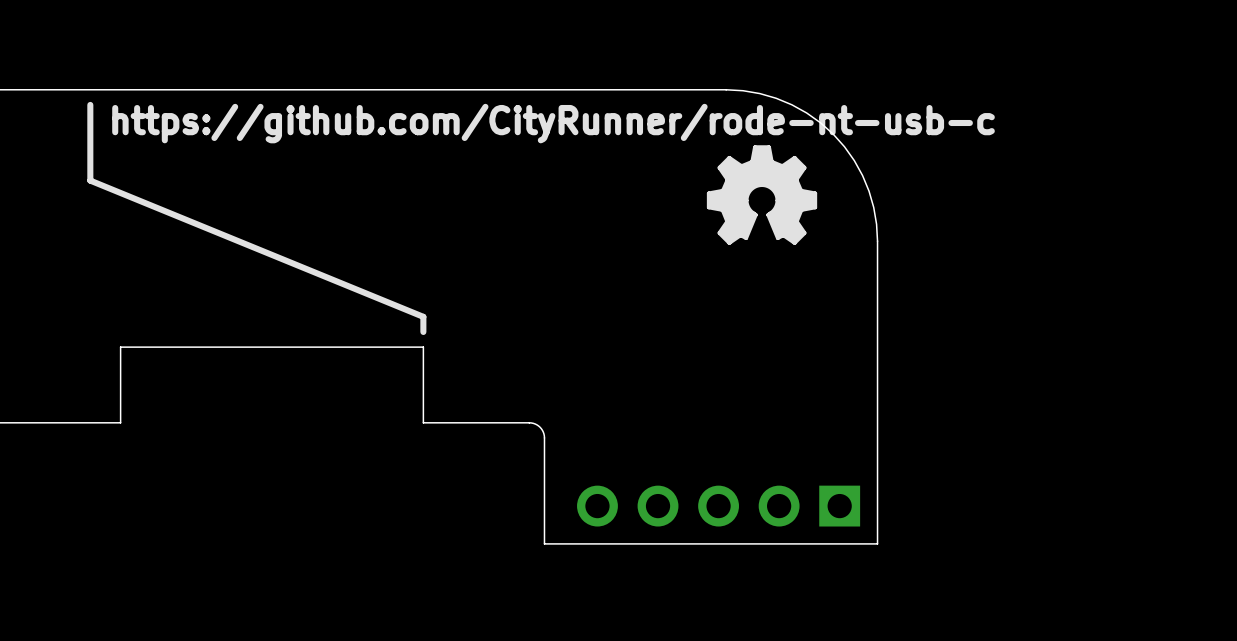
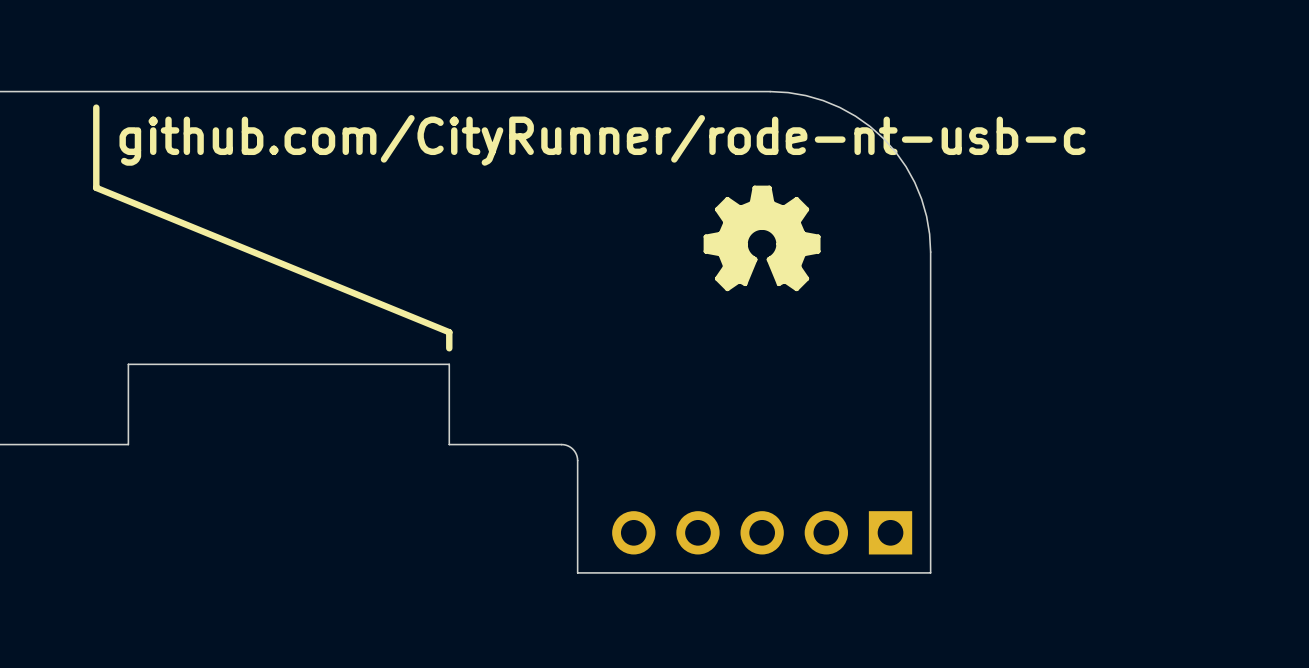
text: https://github.com/CityRunner/rode-nt-usb-c (553, 123) -> github.com/CityRunner/rode-nt-usb-c (602, 140)
line: (768, 146) (754, 146) (752, 160) (742, 165) (728, 157) (719, 167) (726, 179) (722, 189) (708, 193) (708, 207) (722, 210) (726, 221) (719, 233) (729, 243) (740, 236) (746, 238) (756, 214) (748, 206) (747, 197) (750, 190) (756, 186) (767, 186) (775, 194) (775, 206) (767, 214) (777, 238) (783, 236) (795, 243) (804, 233) (797, 221) (801, 210) (815, 207) (815, 193) (801, 190) (797, 180) (804, 167) (794, 157) (782, 165) (772, 161) (768, 146) -> (769, 187) (754, 187) (751, 202) (741, 207) (727, 198) (716, 209) (724, 221) (720, 232) (705, 236) (705, 251) (720, 255) (724, 266) (716, 278) (727, 289) (738, 281) (745, 284) (755, 259) (747, 251) (746, 240) (749, 234) (755, 229) (768, 229) (776, 237) (776, 250) (768, 259) (778, 284) (785, 281) (797, 289) (807, 278) (799, 266) (803, 255) (818, 251) (818, 236) (804, 233) (799, 222) (807, 209) (796, 198) (784, 206) (773, 203) (769, 187)
drawing position: (762, 195) -> (762, 238)

